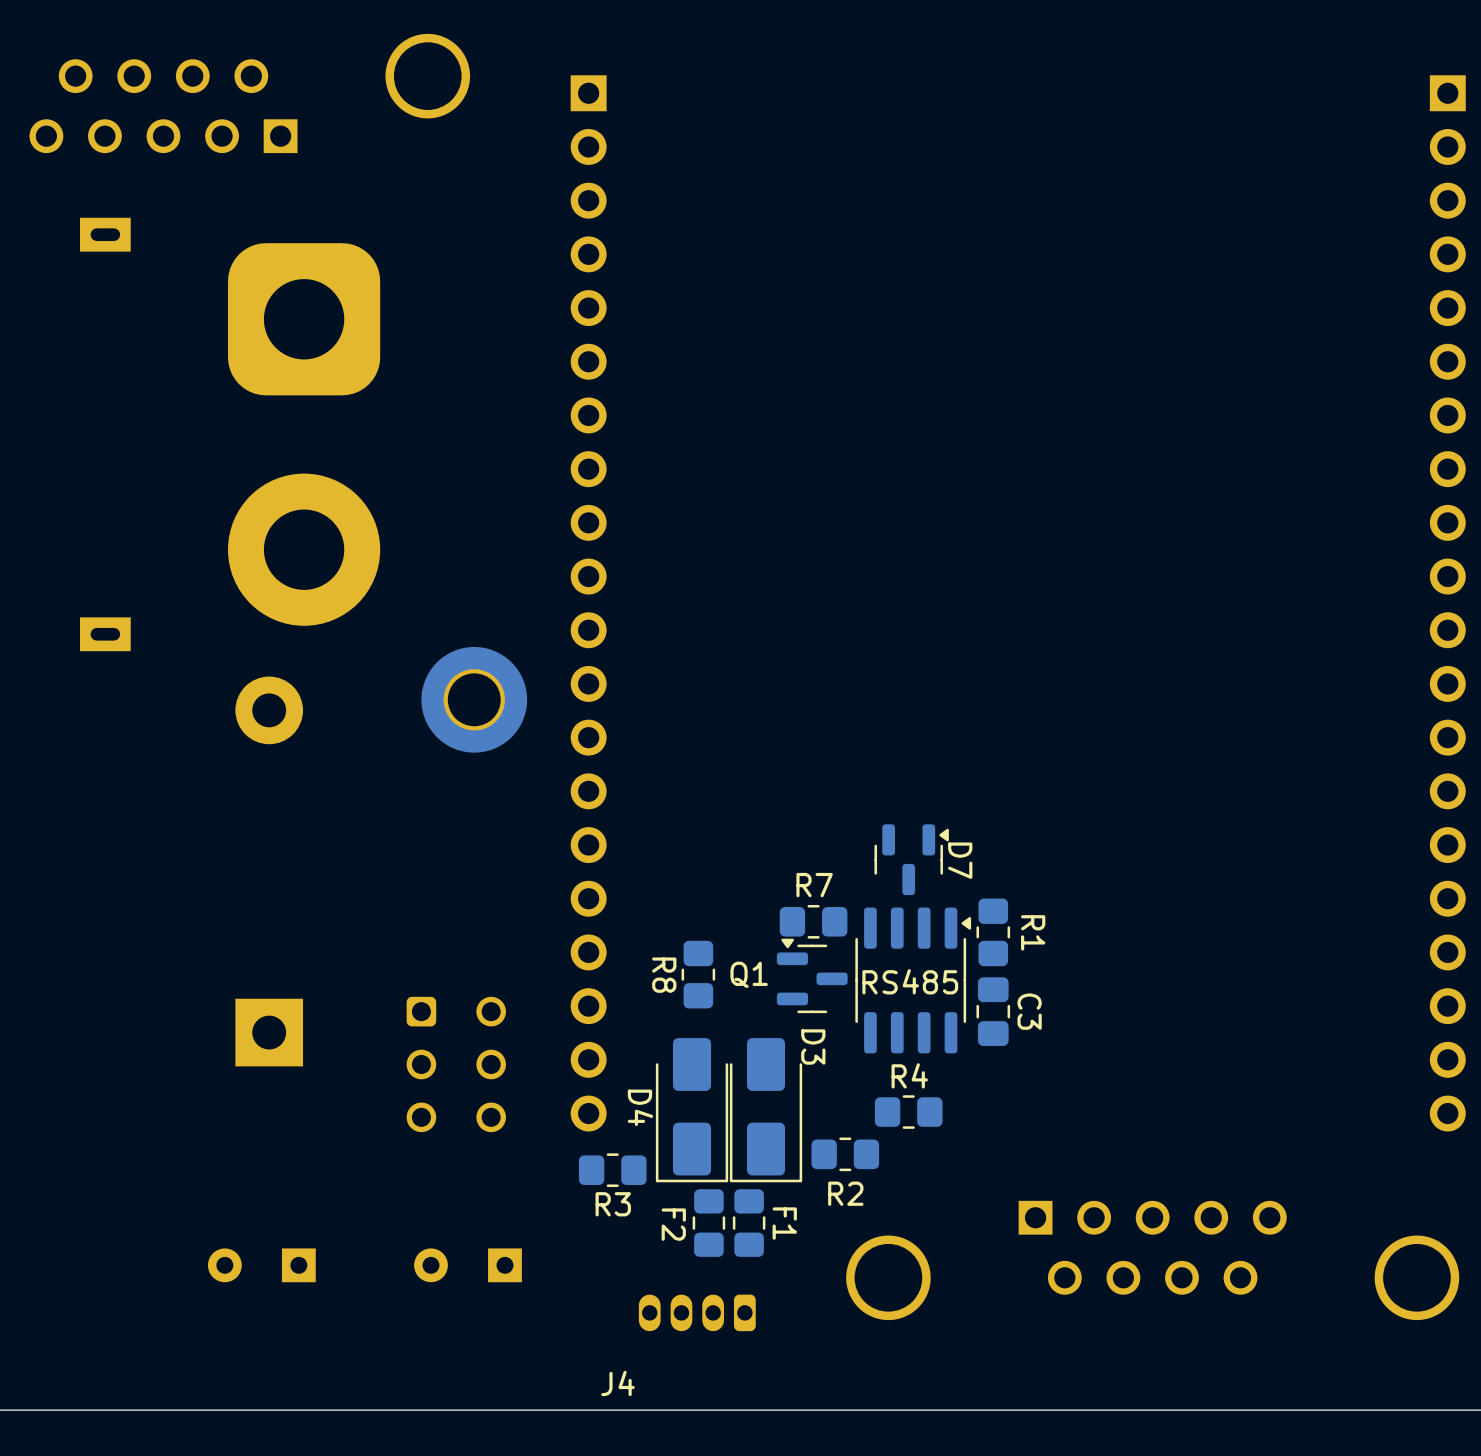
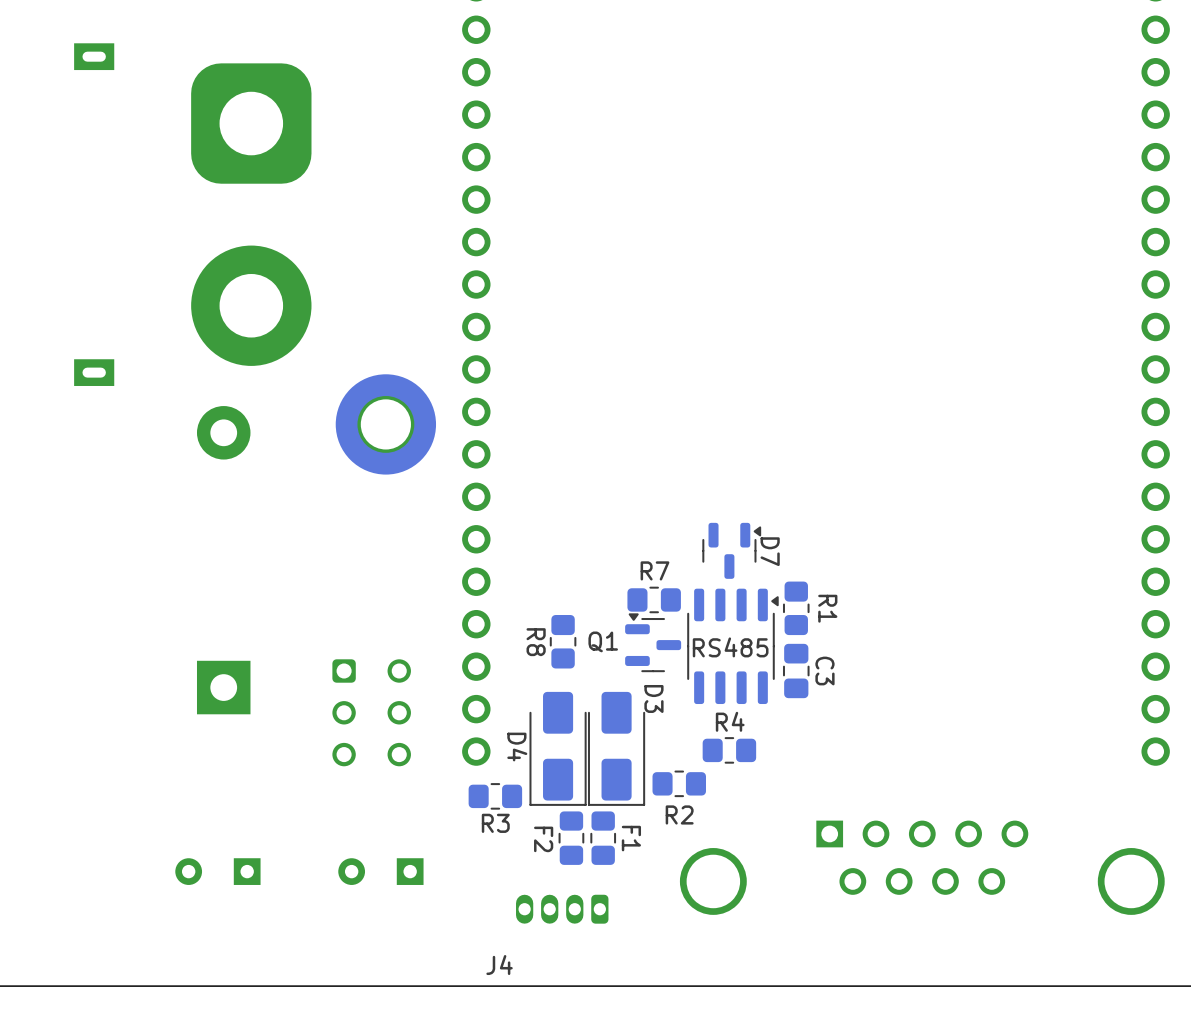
part footprint: [421, 646, 528, 753] -> [335, 374, 437, 475]

